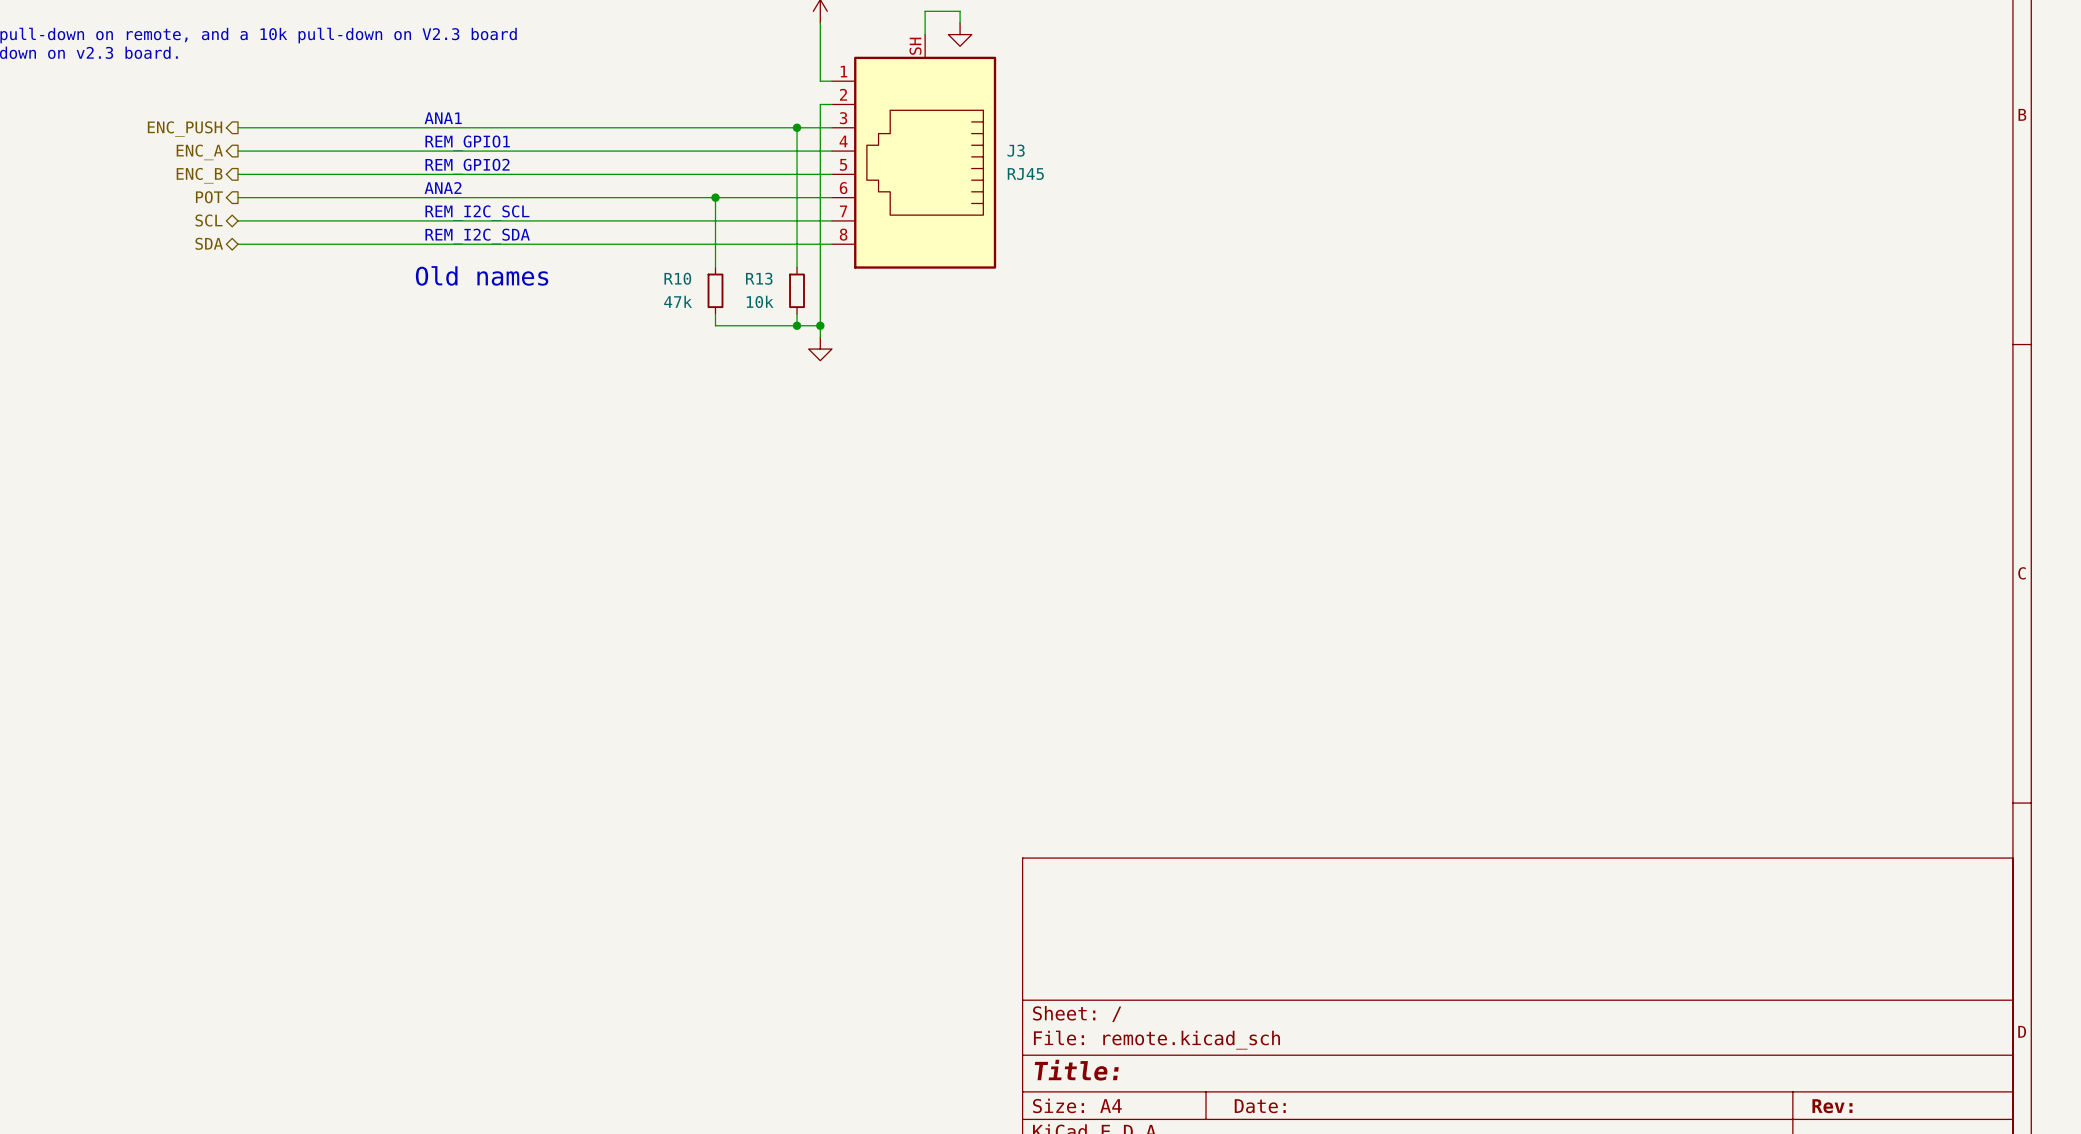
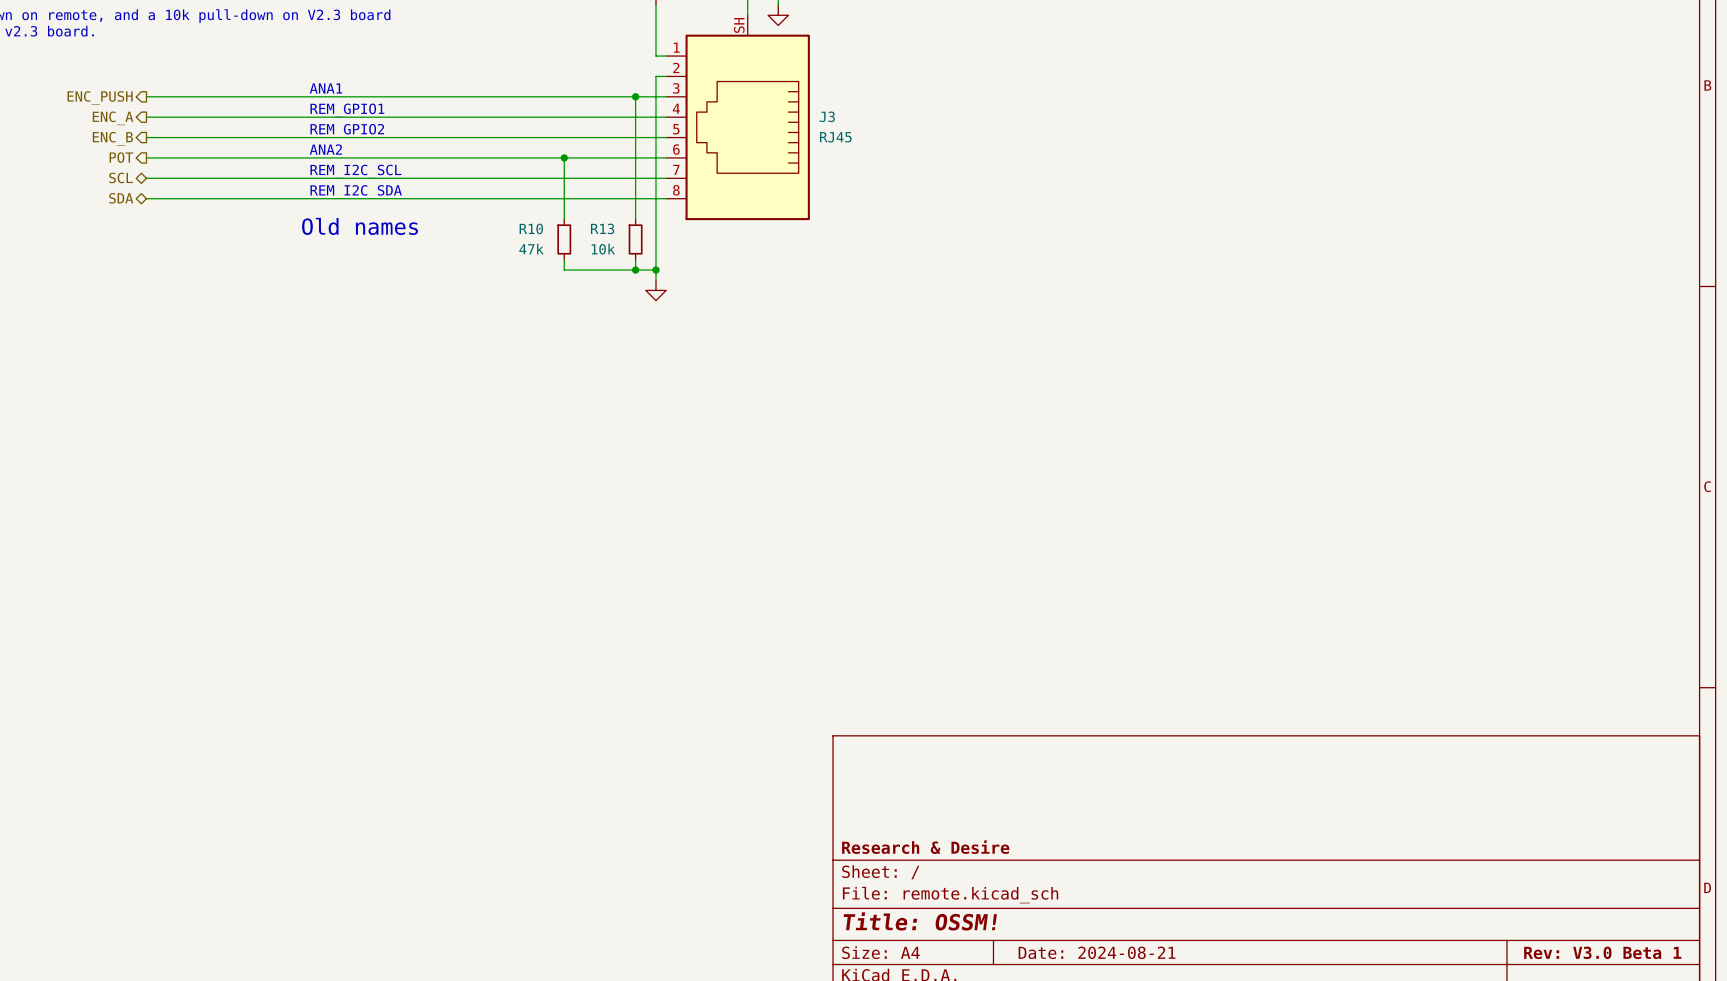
title block: none -> Research & Desire (925, 847)
title block: Title: (1076, 1070) -> Title: OSSM! (920, 921)
title block: Date: (1260, 1106) -> Date: 2024-08-21 (1097, 952)
title block: Rev: (1832, 1106) -> Rev: V3.0 Beta 1 (1602, 952)

